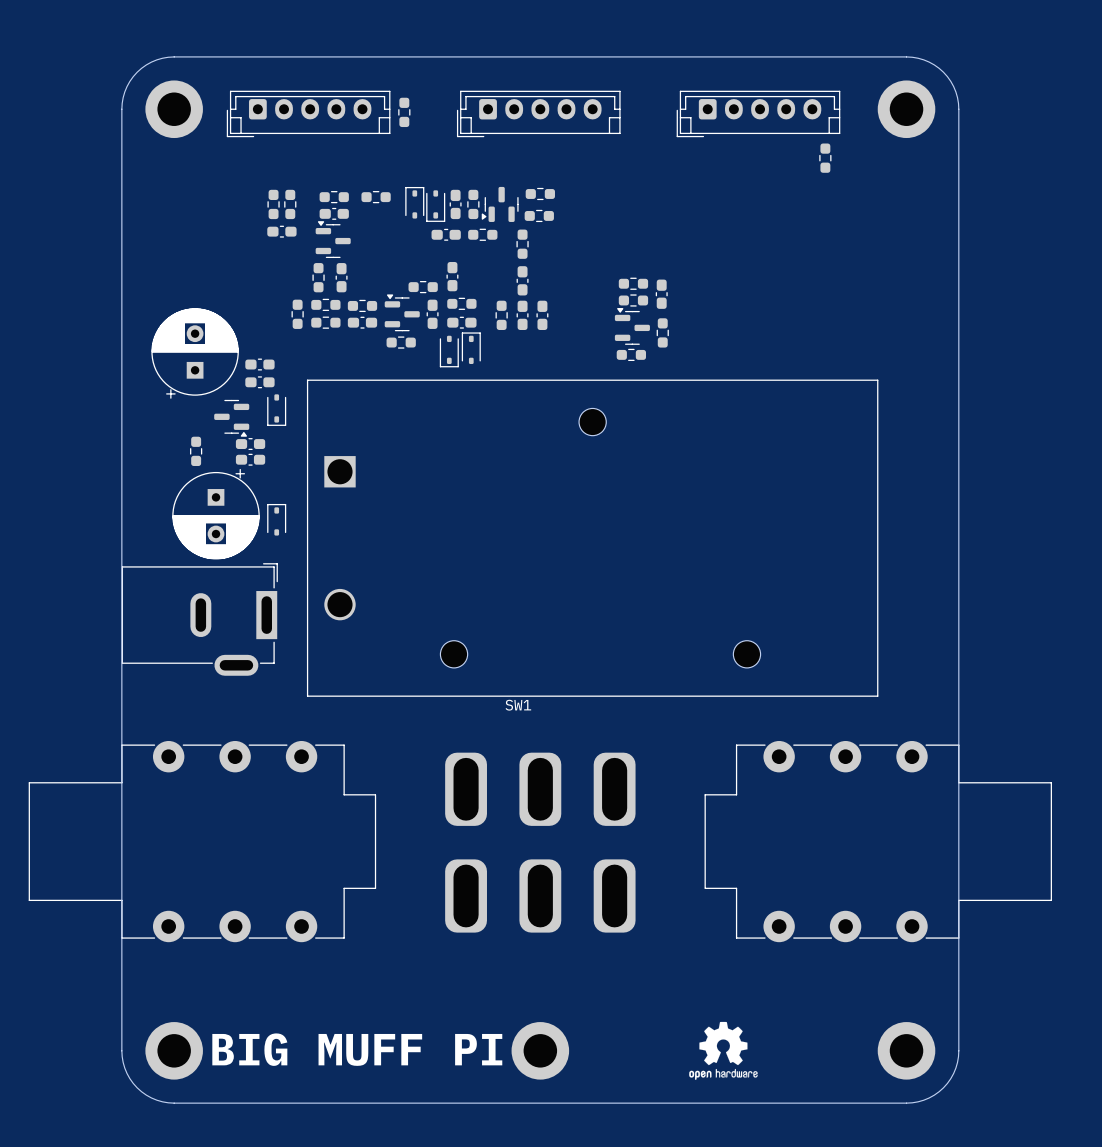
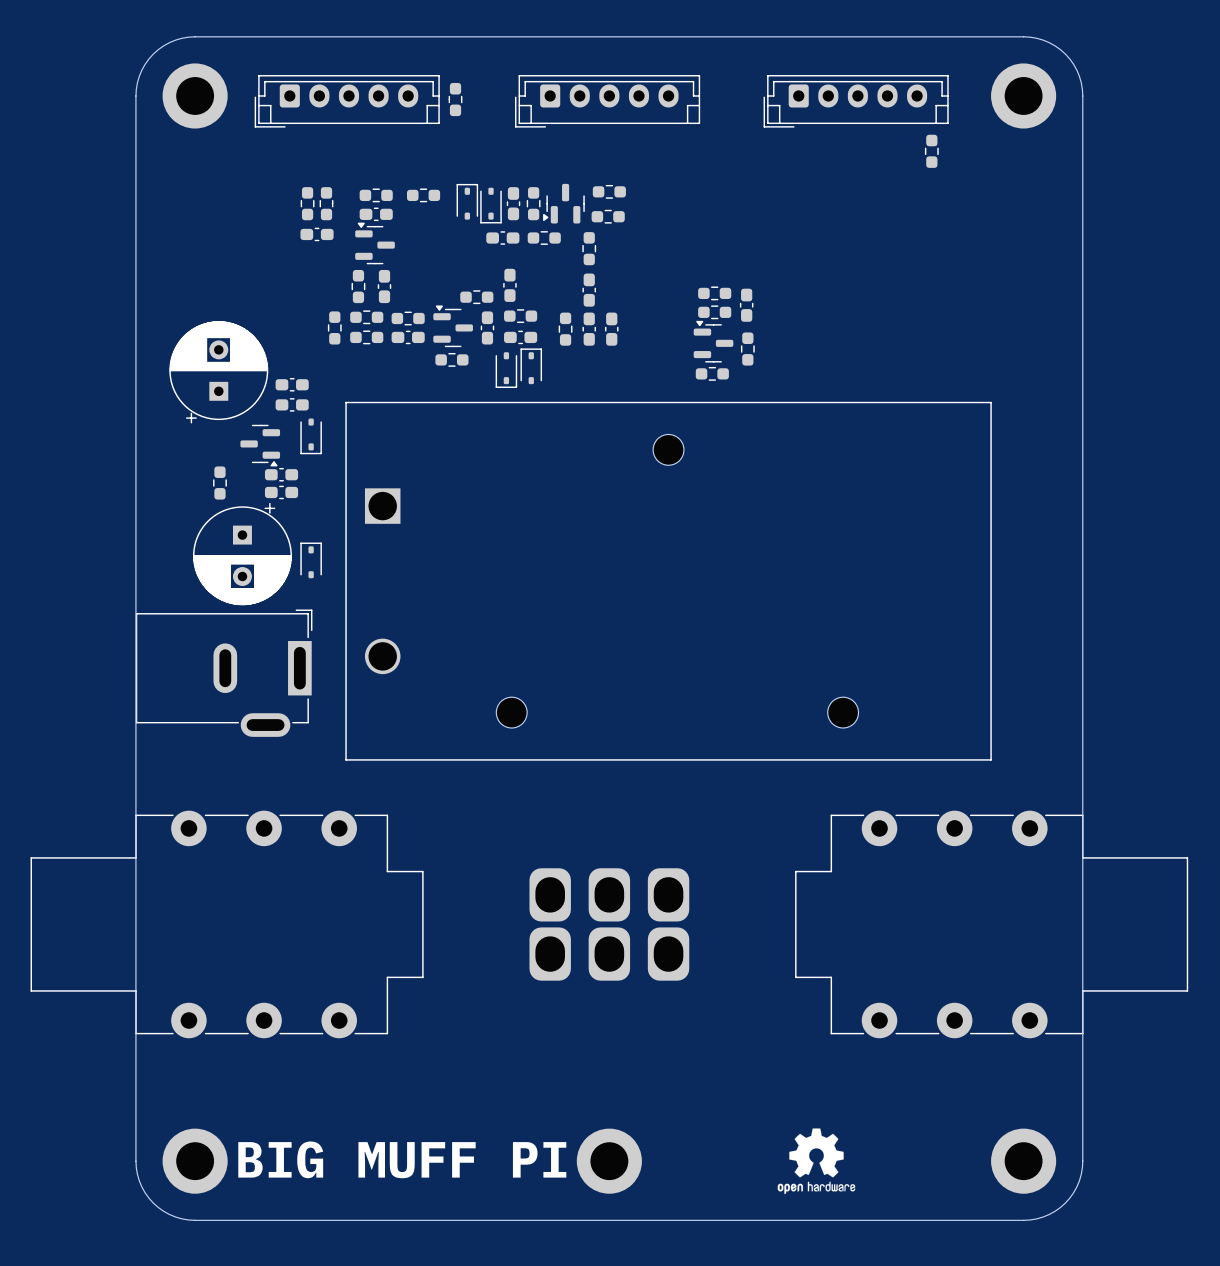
part: none -> (609, 924)
SW1: (540, 842) -> none

